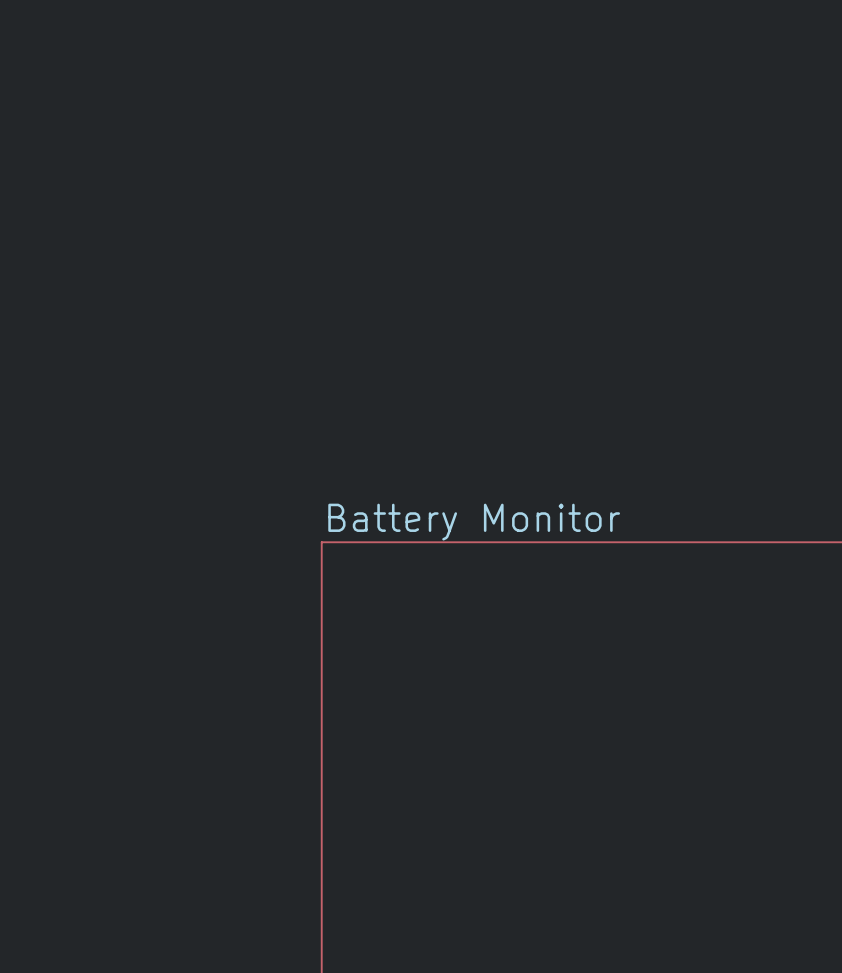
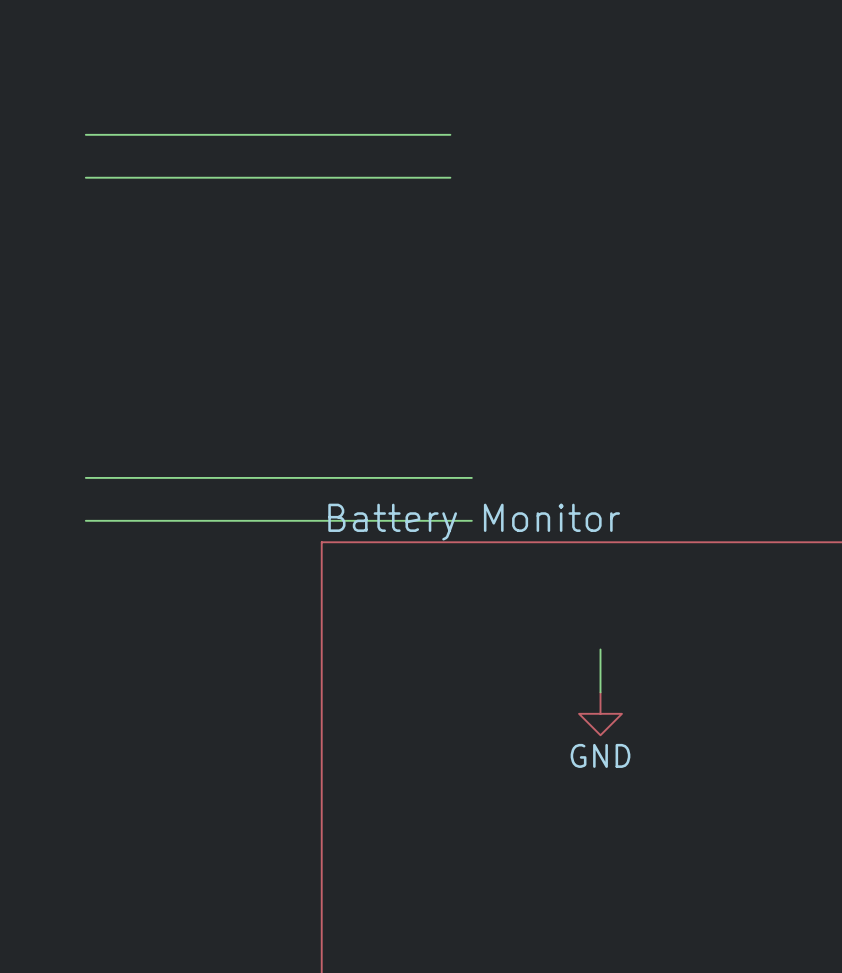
wire: none -> (85, 134) (450, 134)
wire: none -> (85, 177) (450, 177)
wire: none -> (85, 477) (471, 477)
wire: none -> (85, 520) (471, 520)
wire: none -> (600, 649) (600, 692)
power symbol: none -> GND (600, 713)

